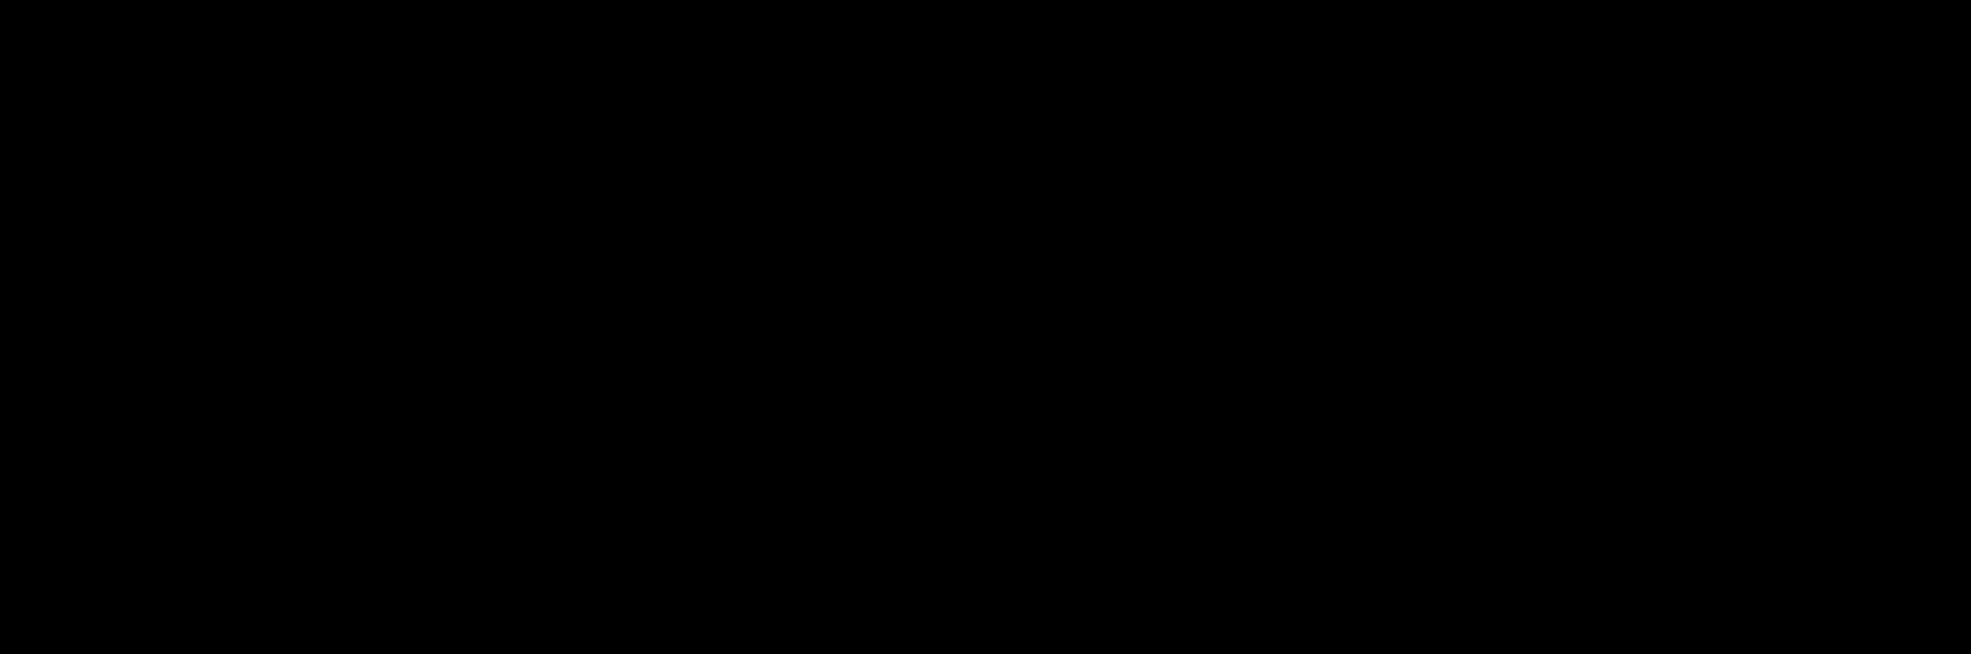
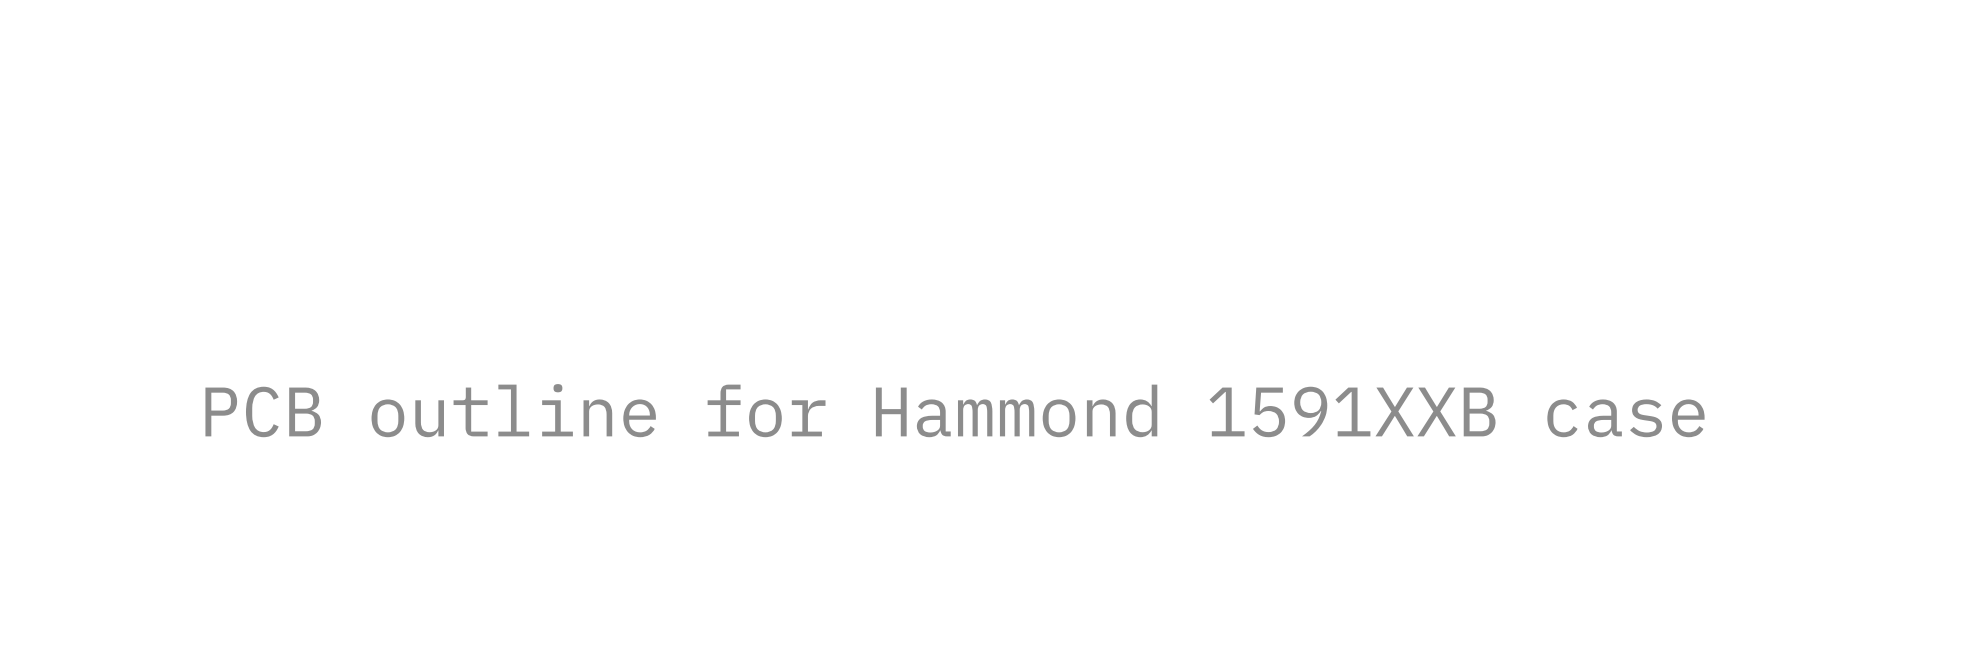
text: none -> PCB outline for Hammond 1591XXB case (955, 410)

